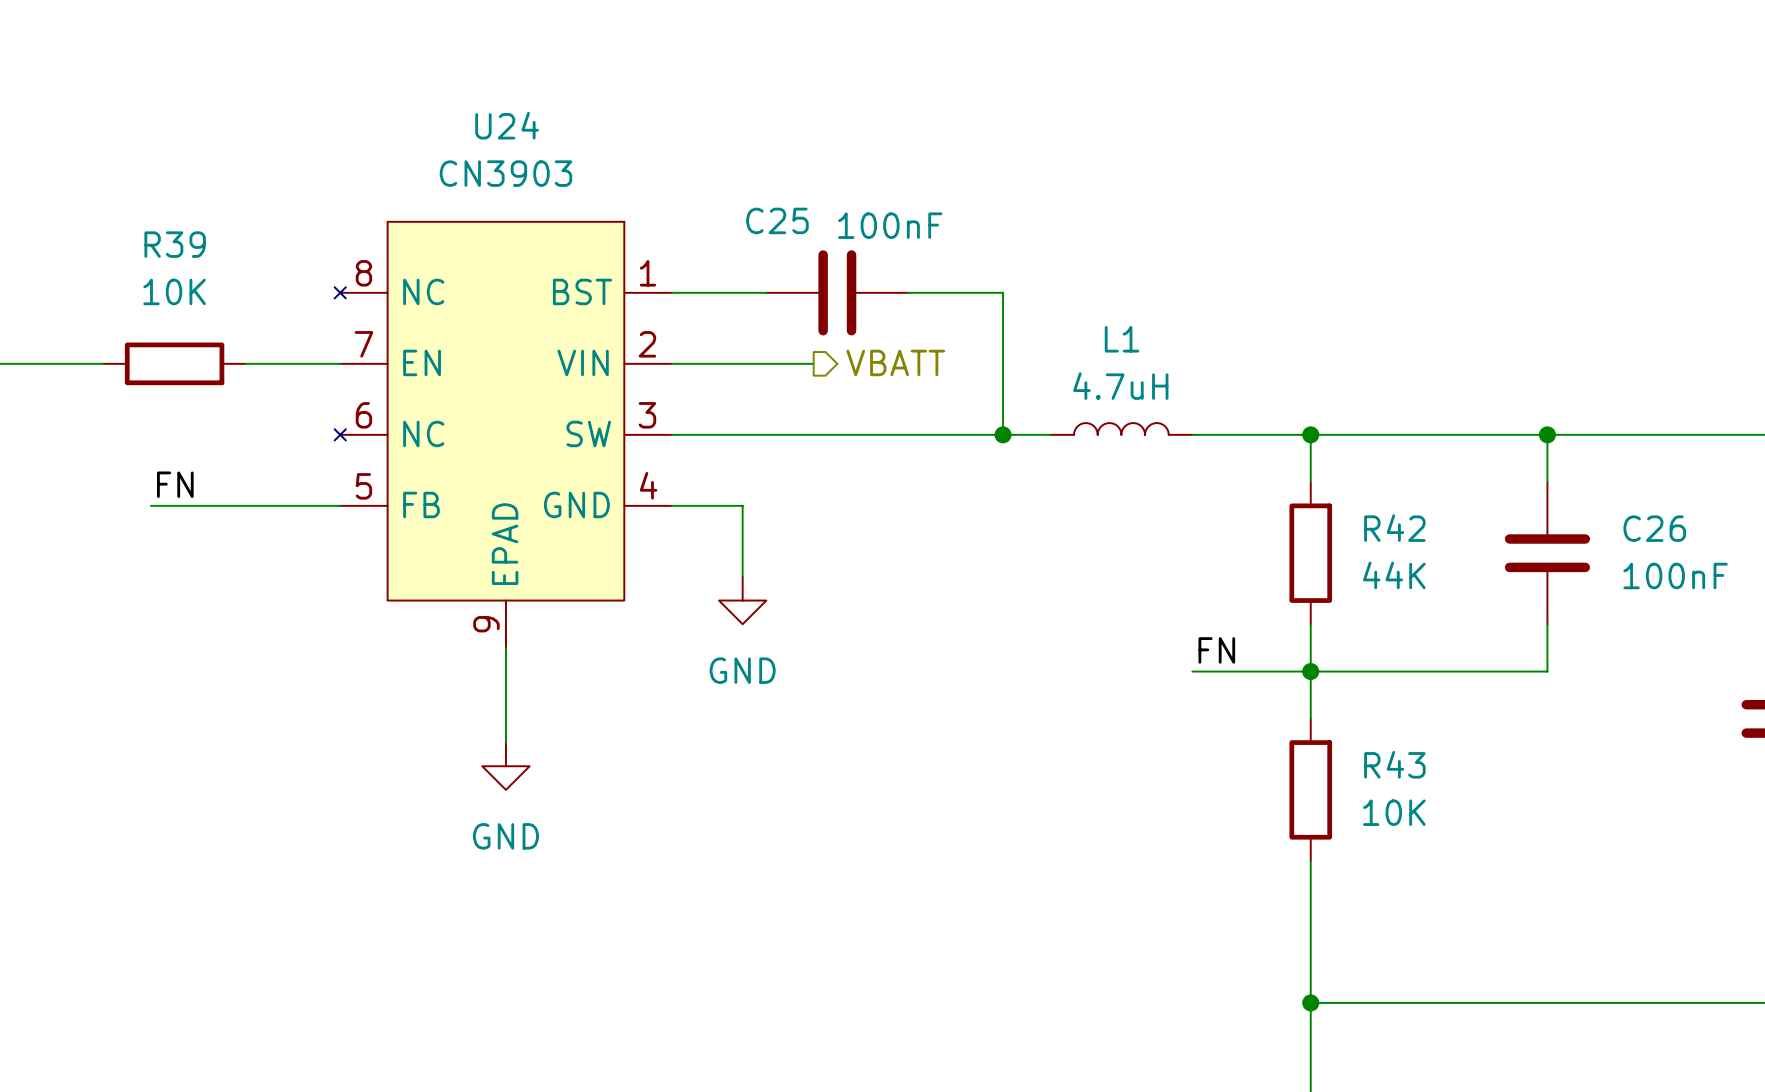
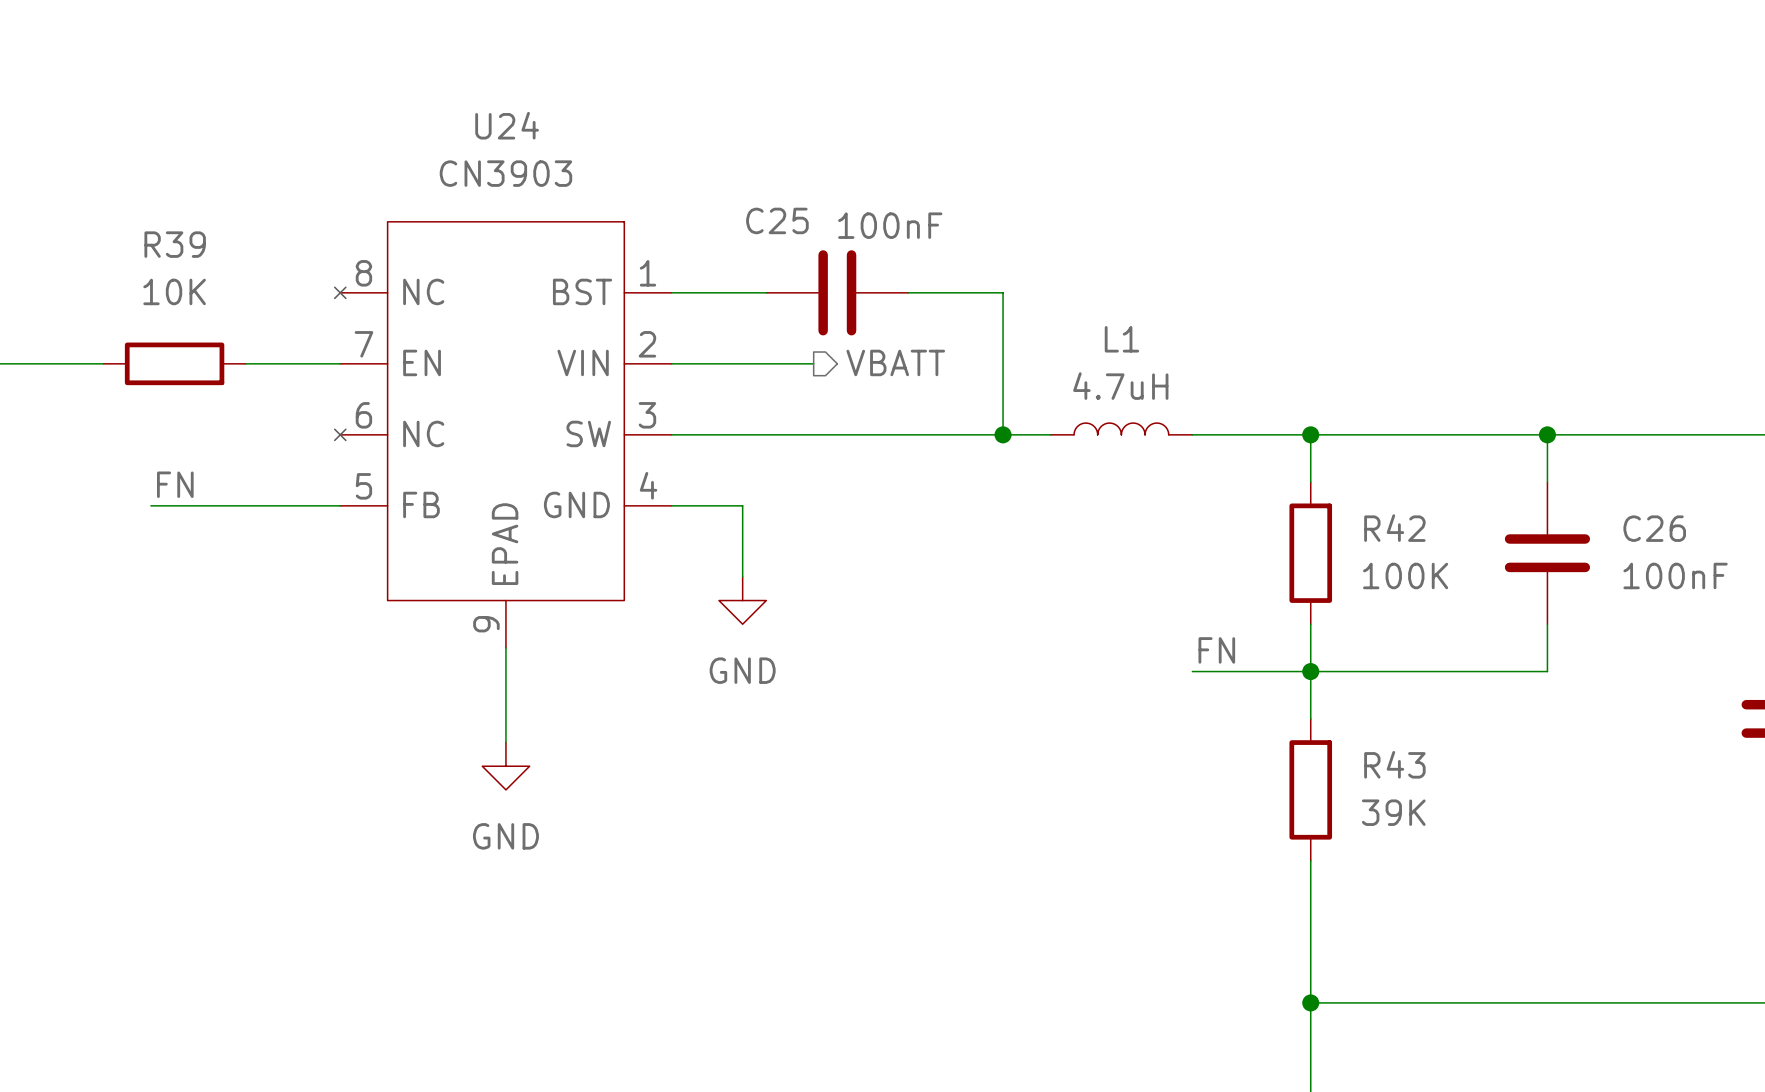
R42 value: 44K (1394, 575) -> 100K (1405, 575)
R43 value: 10K (1394, 812) -> 39K (1393, 812)

